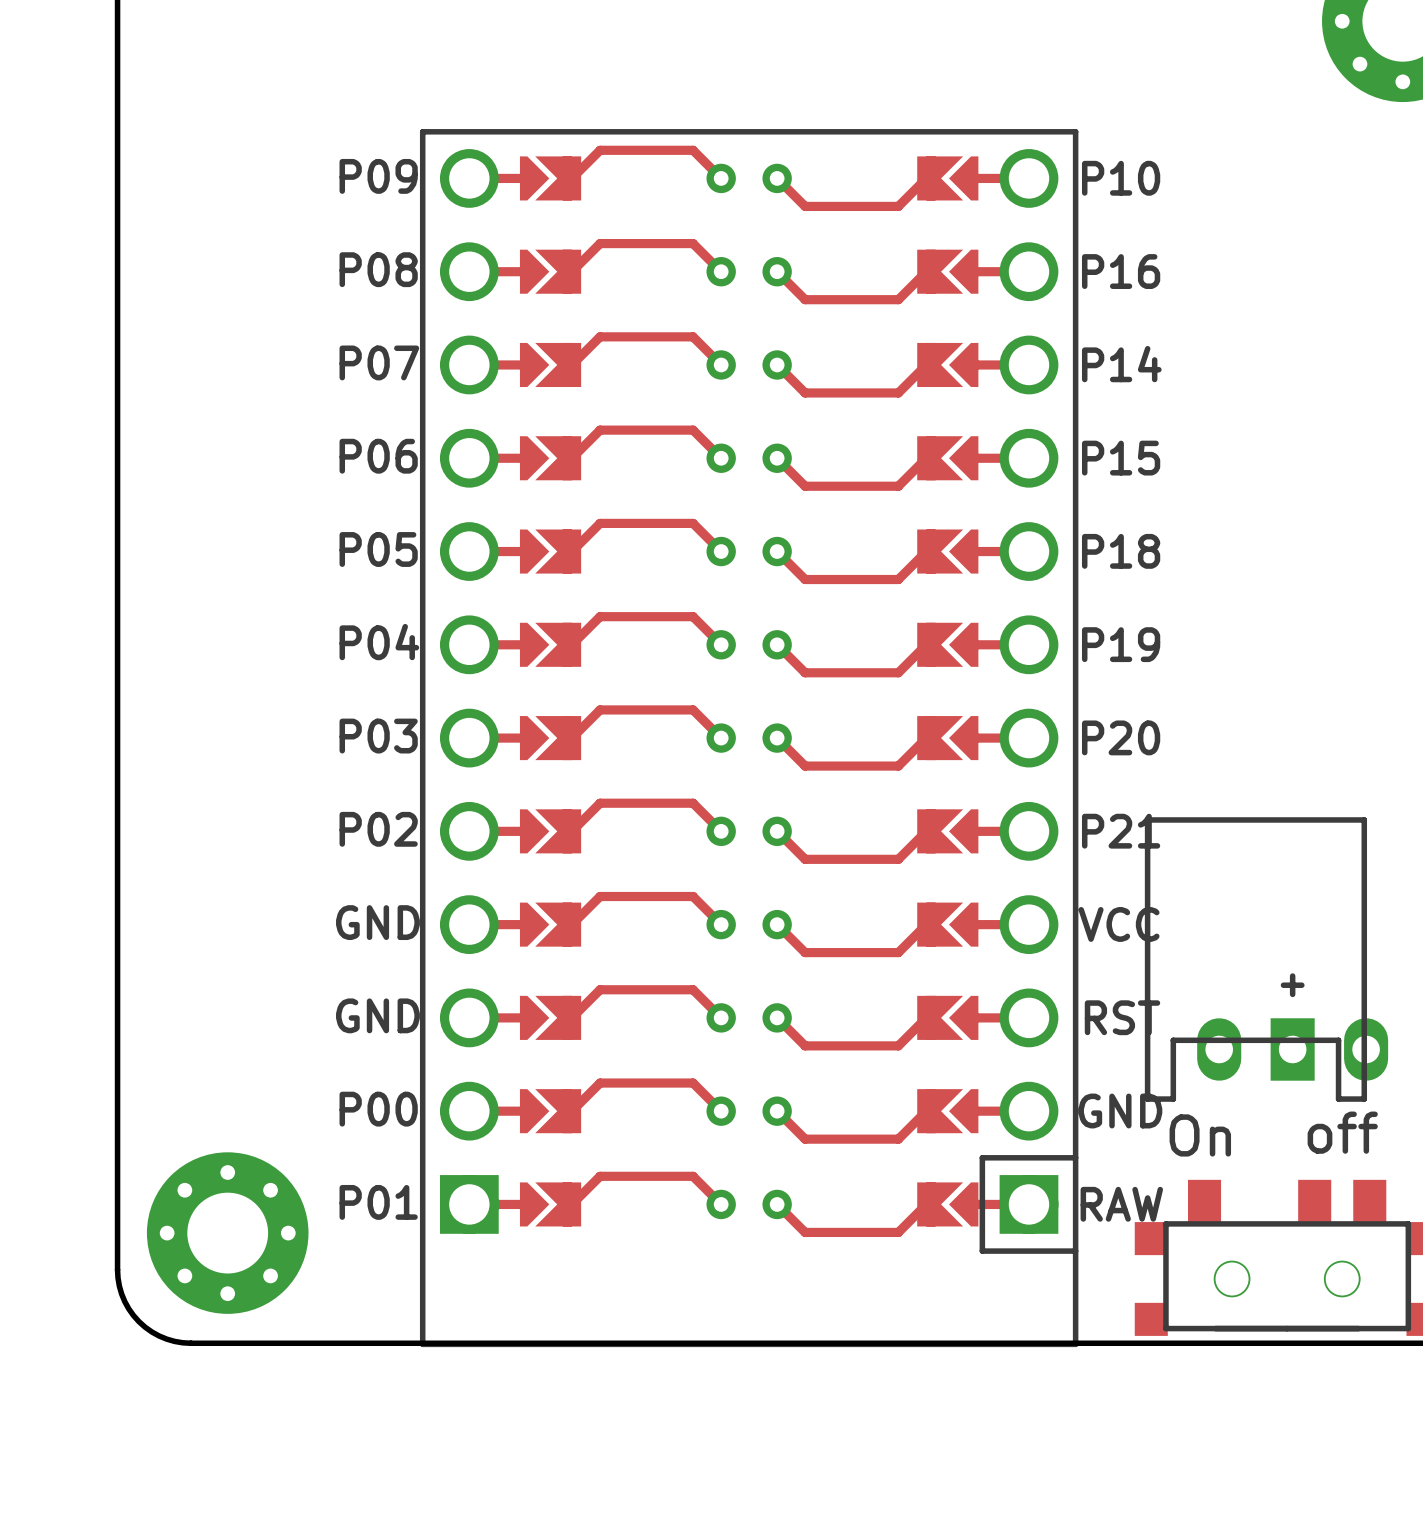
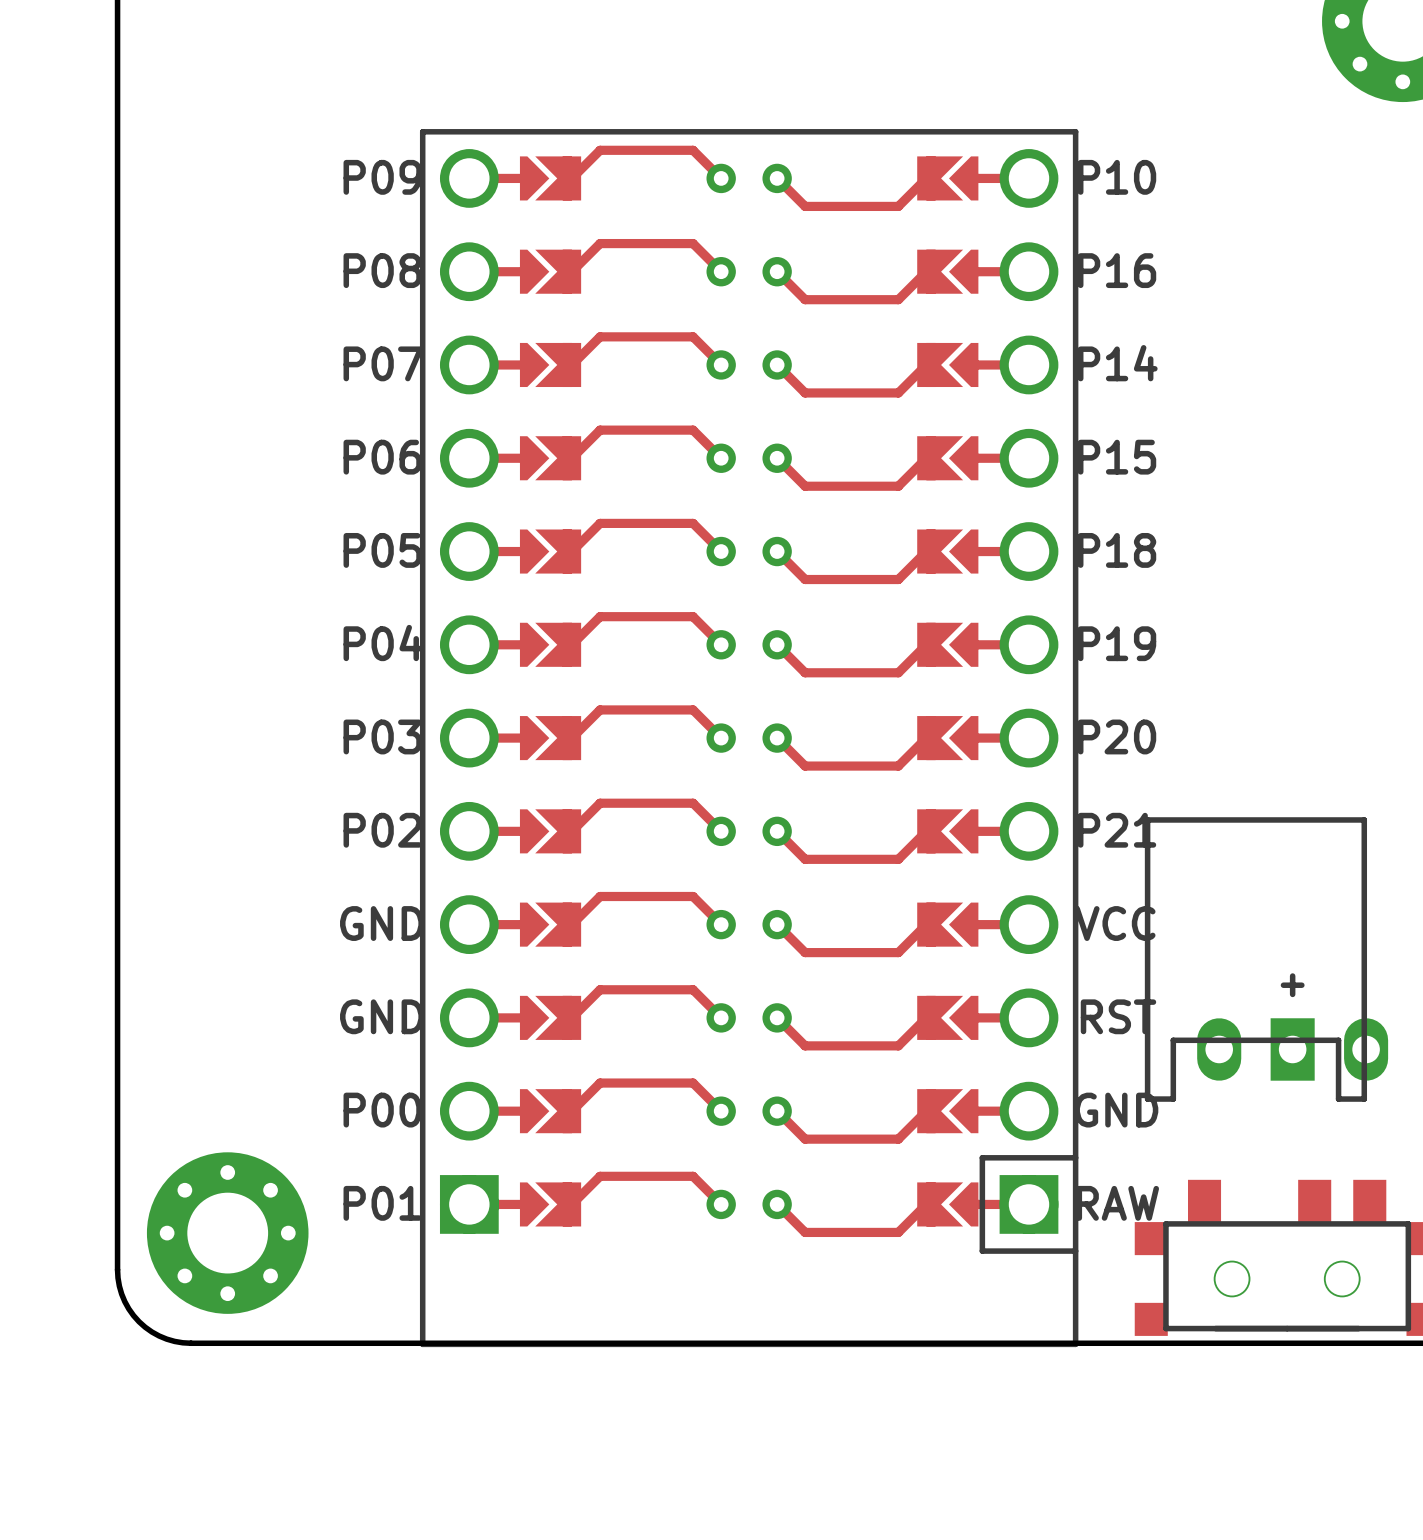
part footprint: [419, 129, 1079, 1348] -> [419, 129, 1079, 1348]
text: off (1342, 1132) -> none
text: On (1200, 1135) -> none

